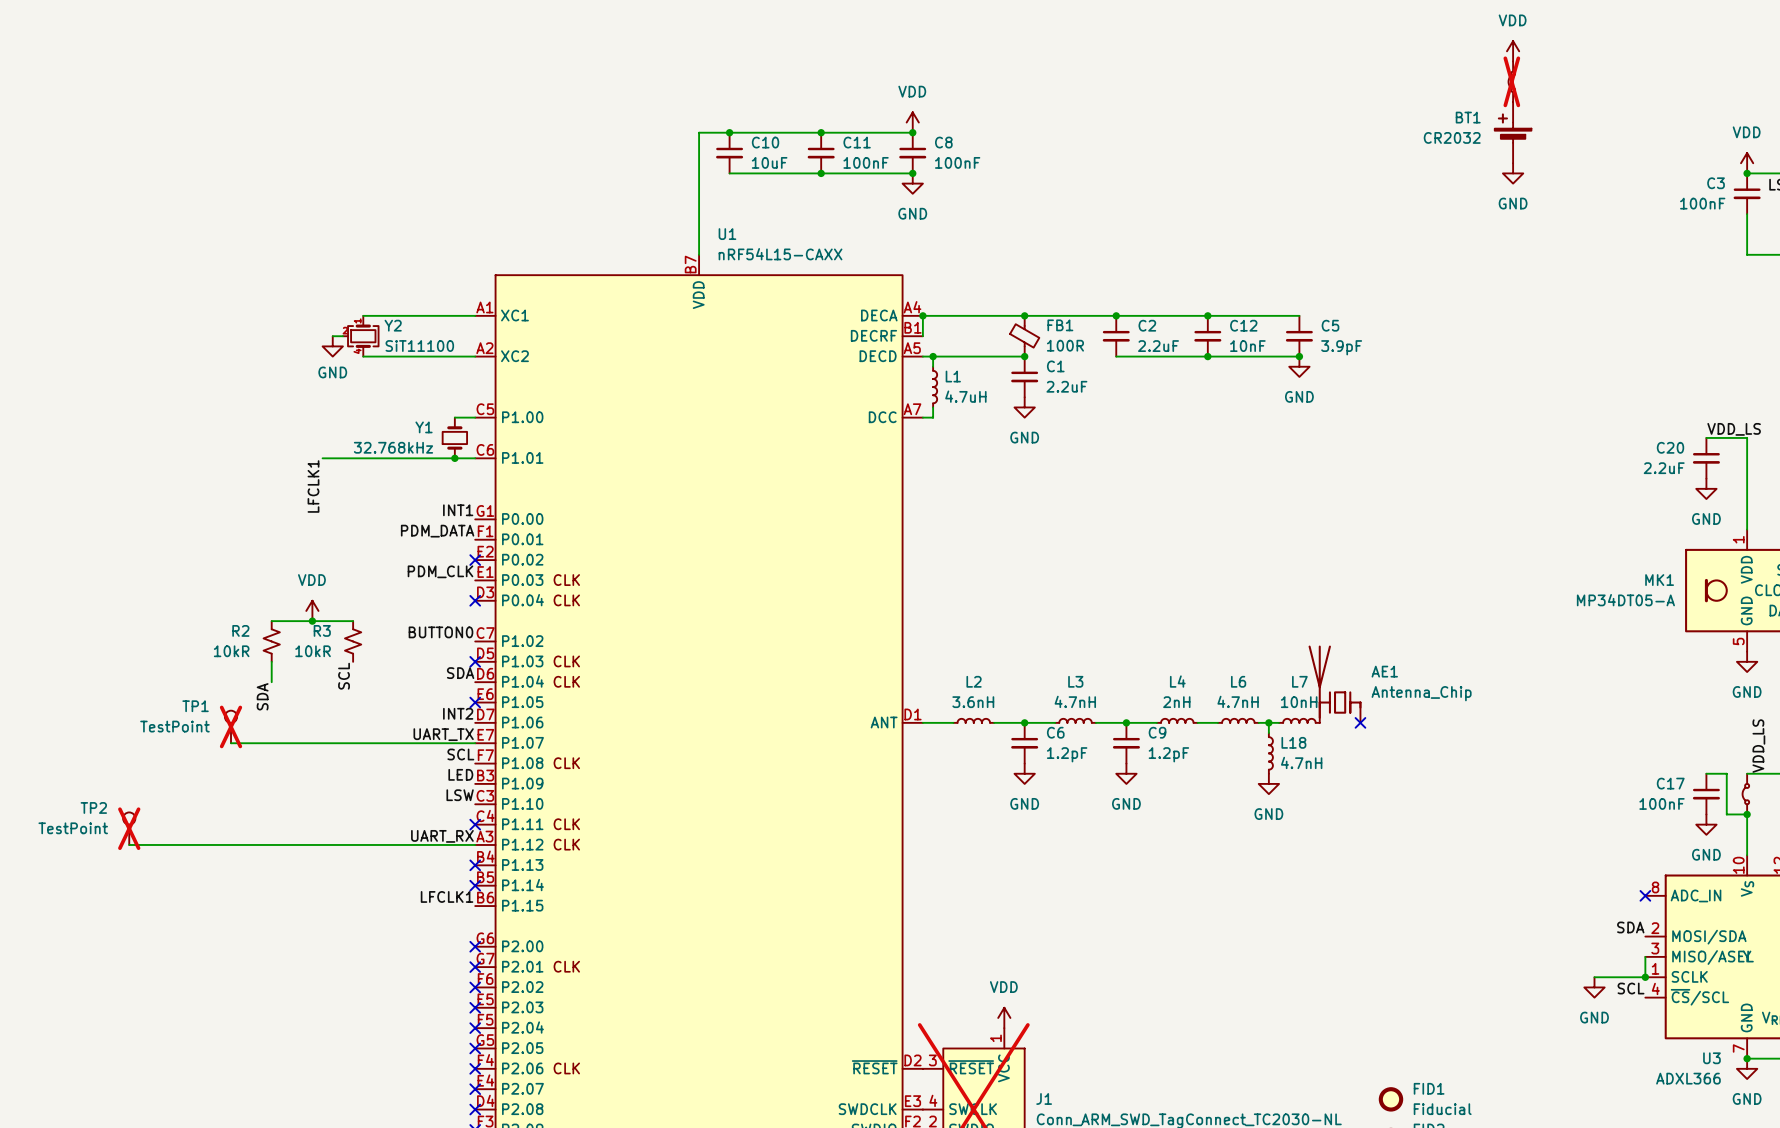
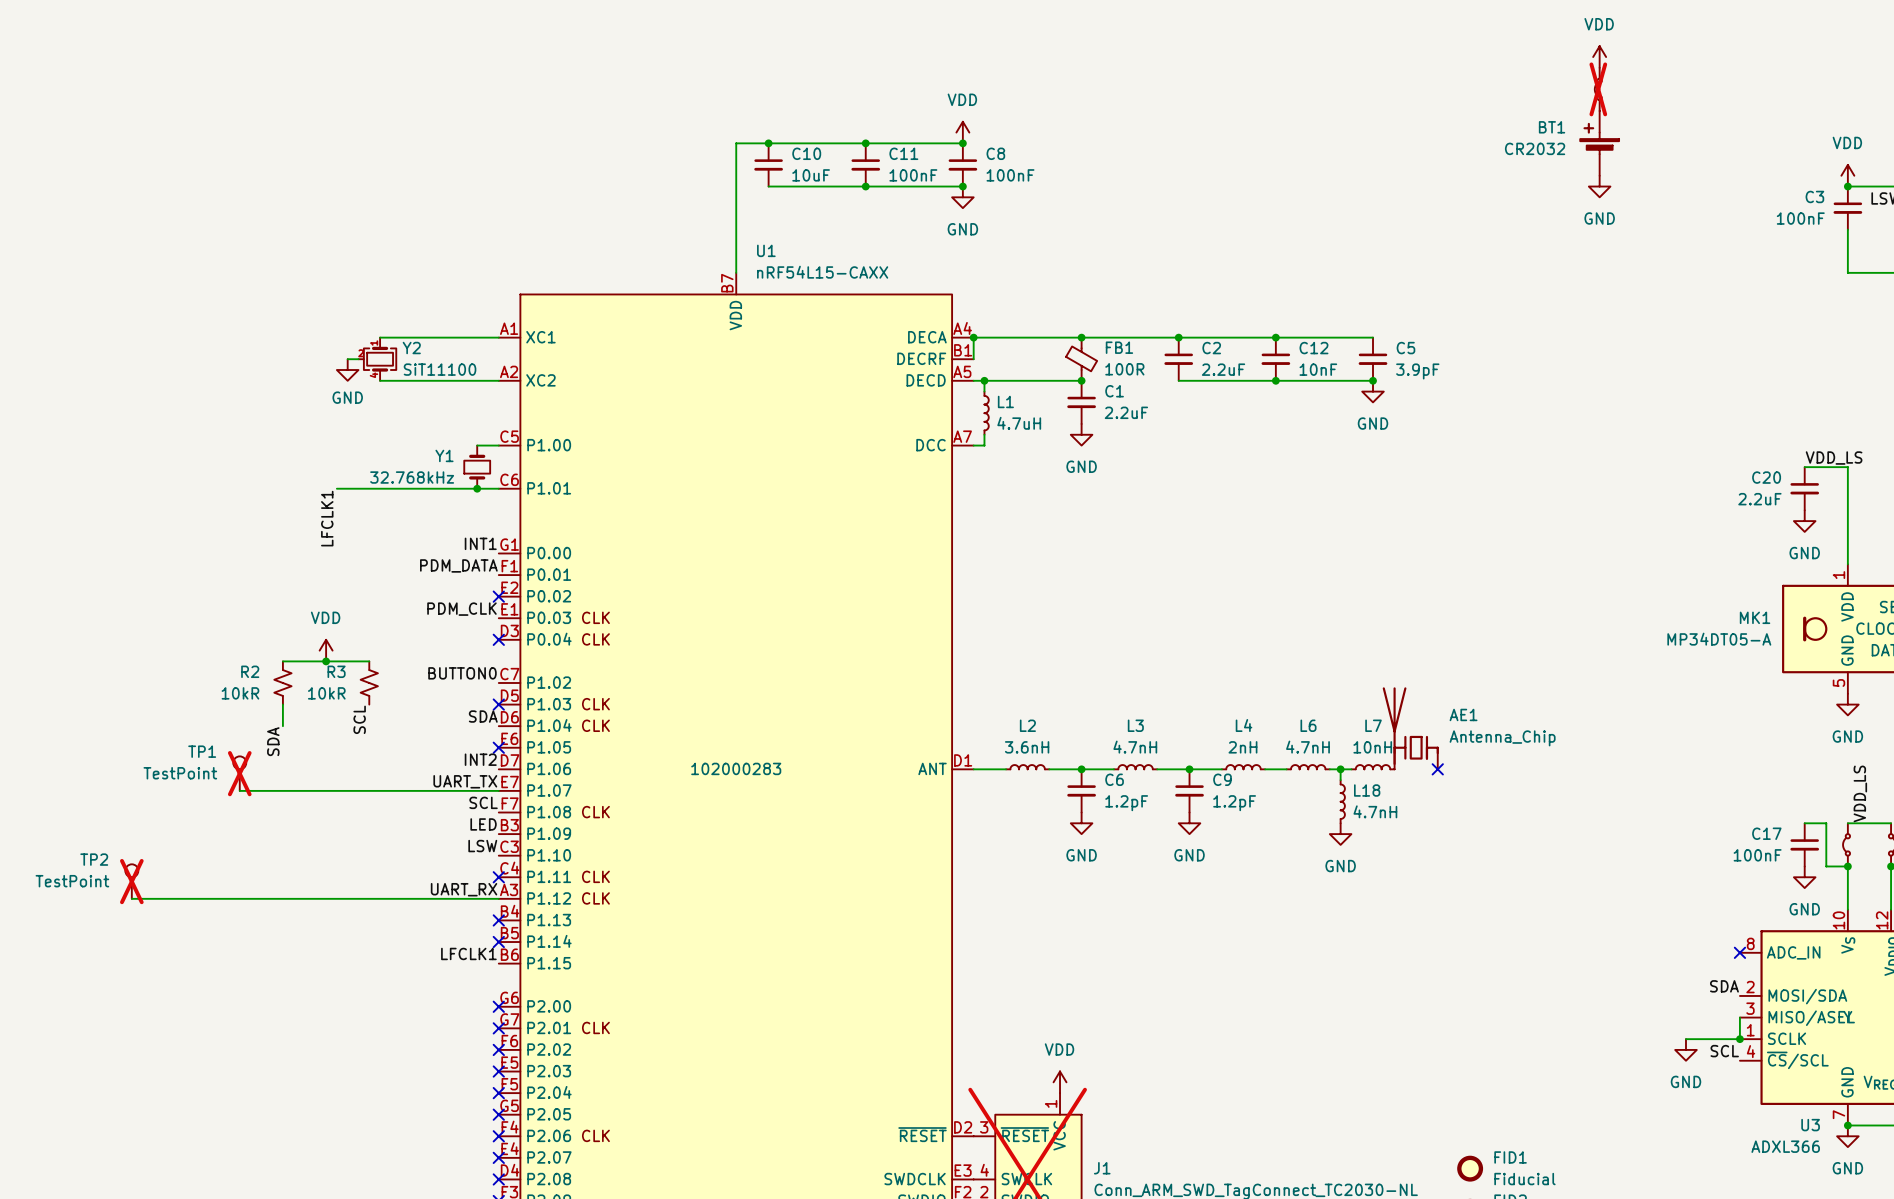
U1 text: none -> 102000283 (736, 768)

